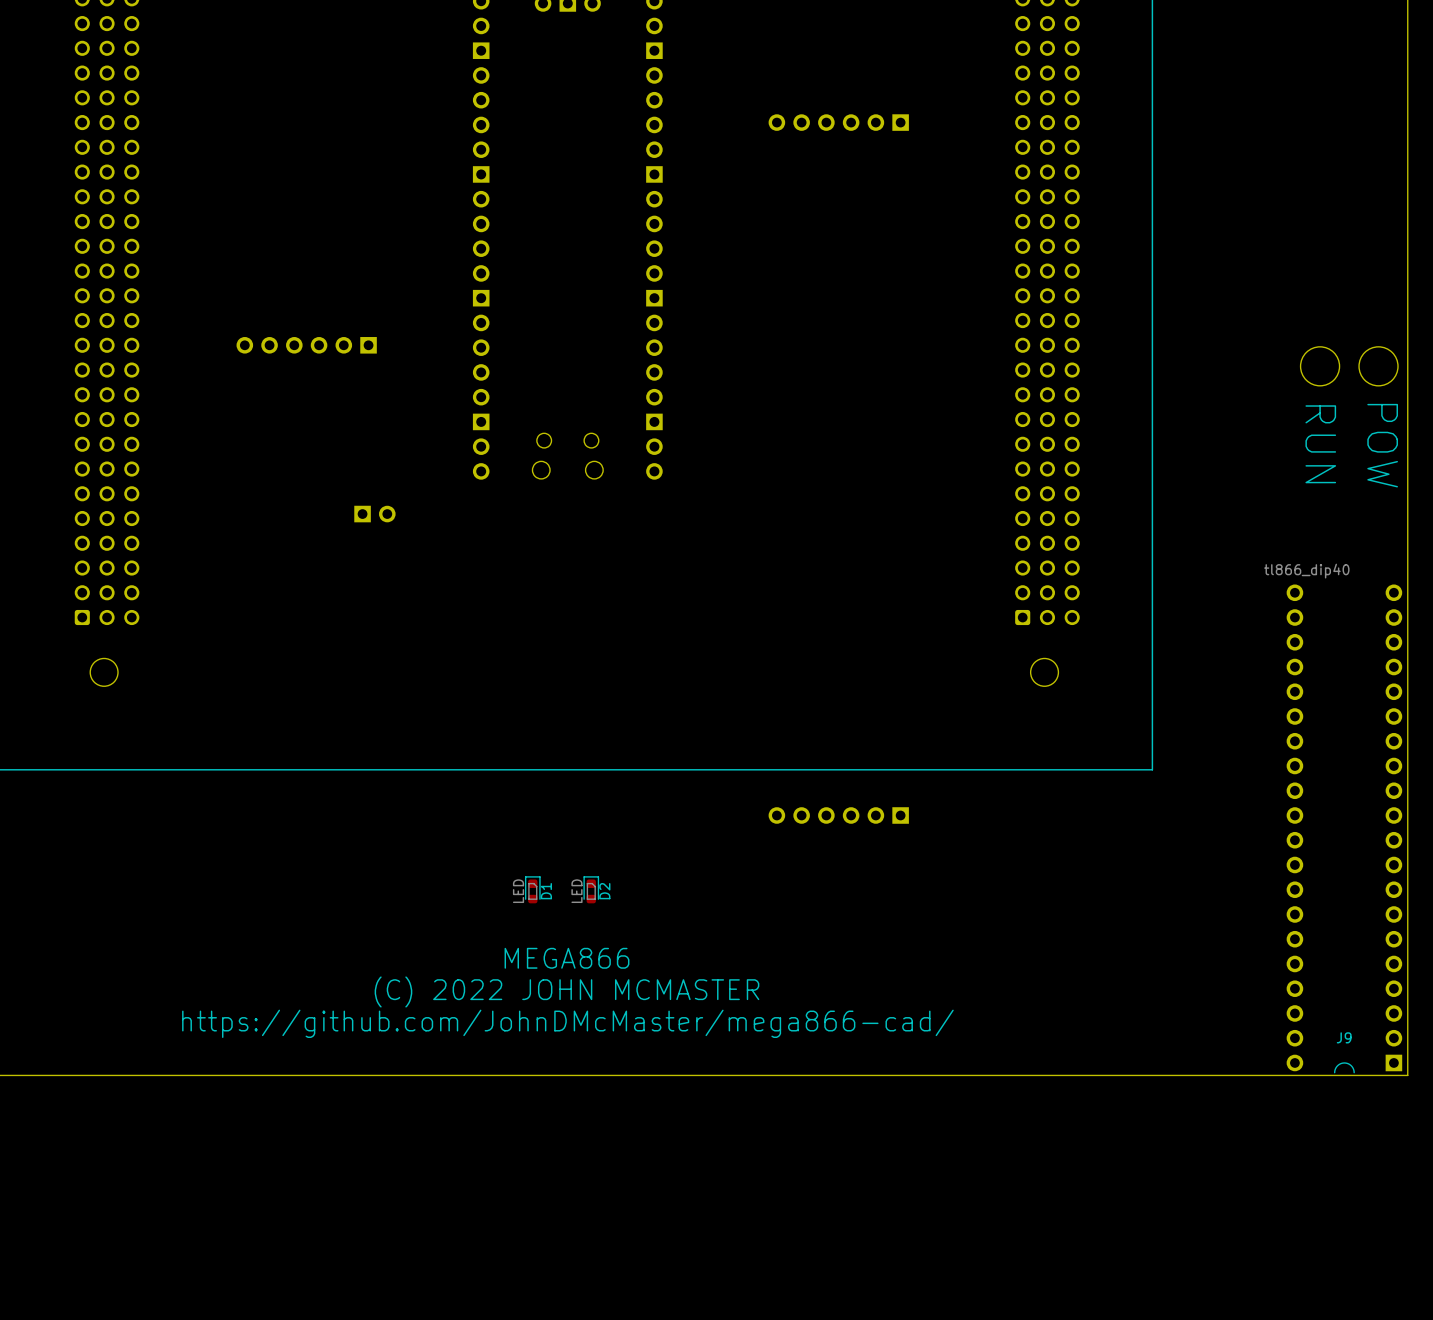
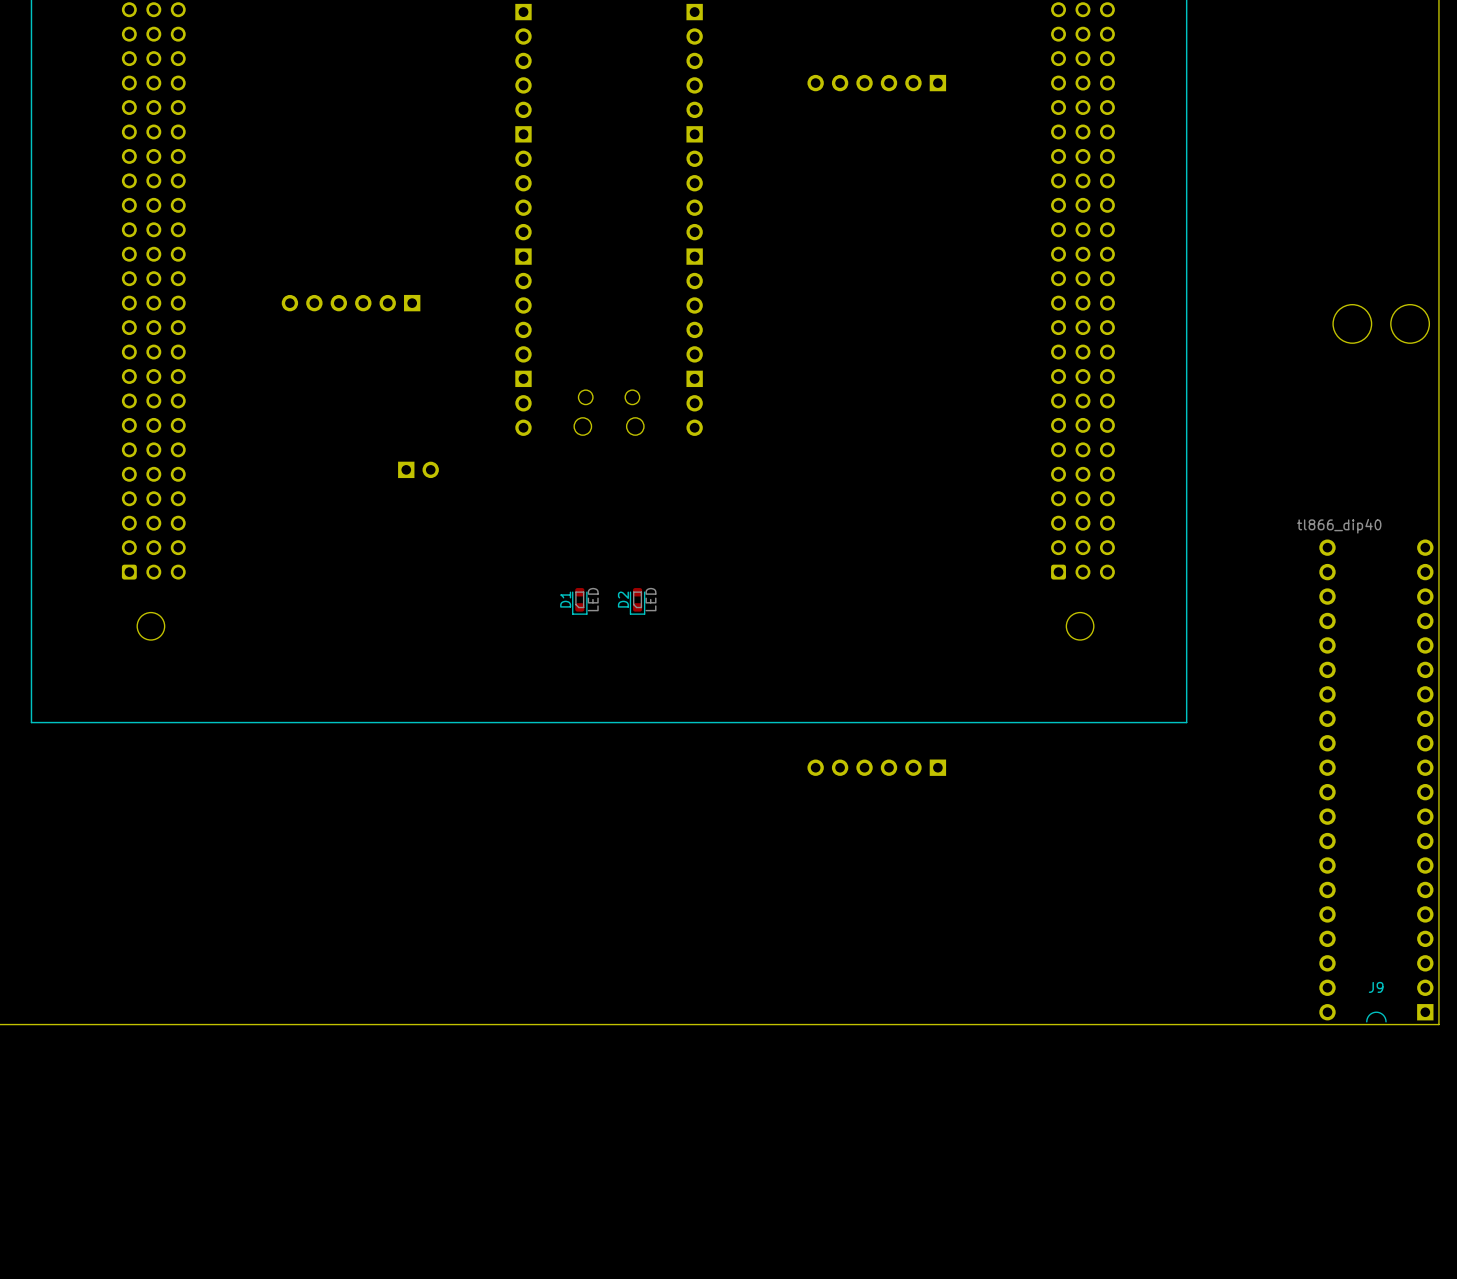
J9 text: RUN (1320, 444) -> none
J9 text: POW (1382, 445) -> none
D1 rotation: 0° (532, 889) -> 180° (579, 601)
D1 position: (532, 889) -> (579, 601)
D2 rotation: 0° (591, 889) -> 180° (637, 601)
D2 position: (591, 889) -> (637, 601)
text: MEGA866 (566, 958) -> none
text: (C) 2022 JOHN MCMASTER (566, 991) -> none
text: https://github.com/JohnDMcMaster/mega866-cad/ (567, 1023) -> none

